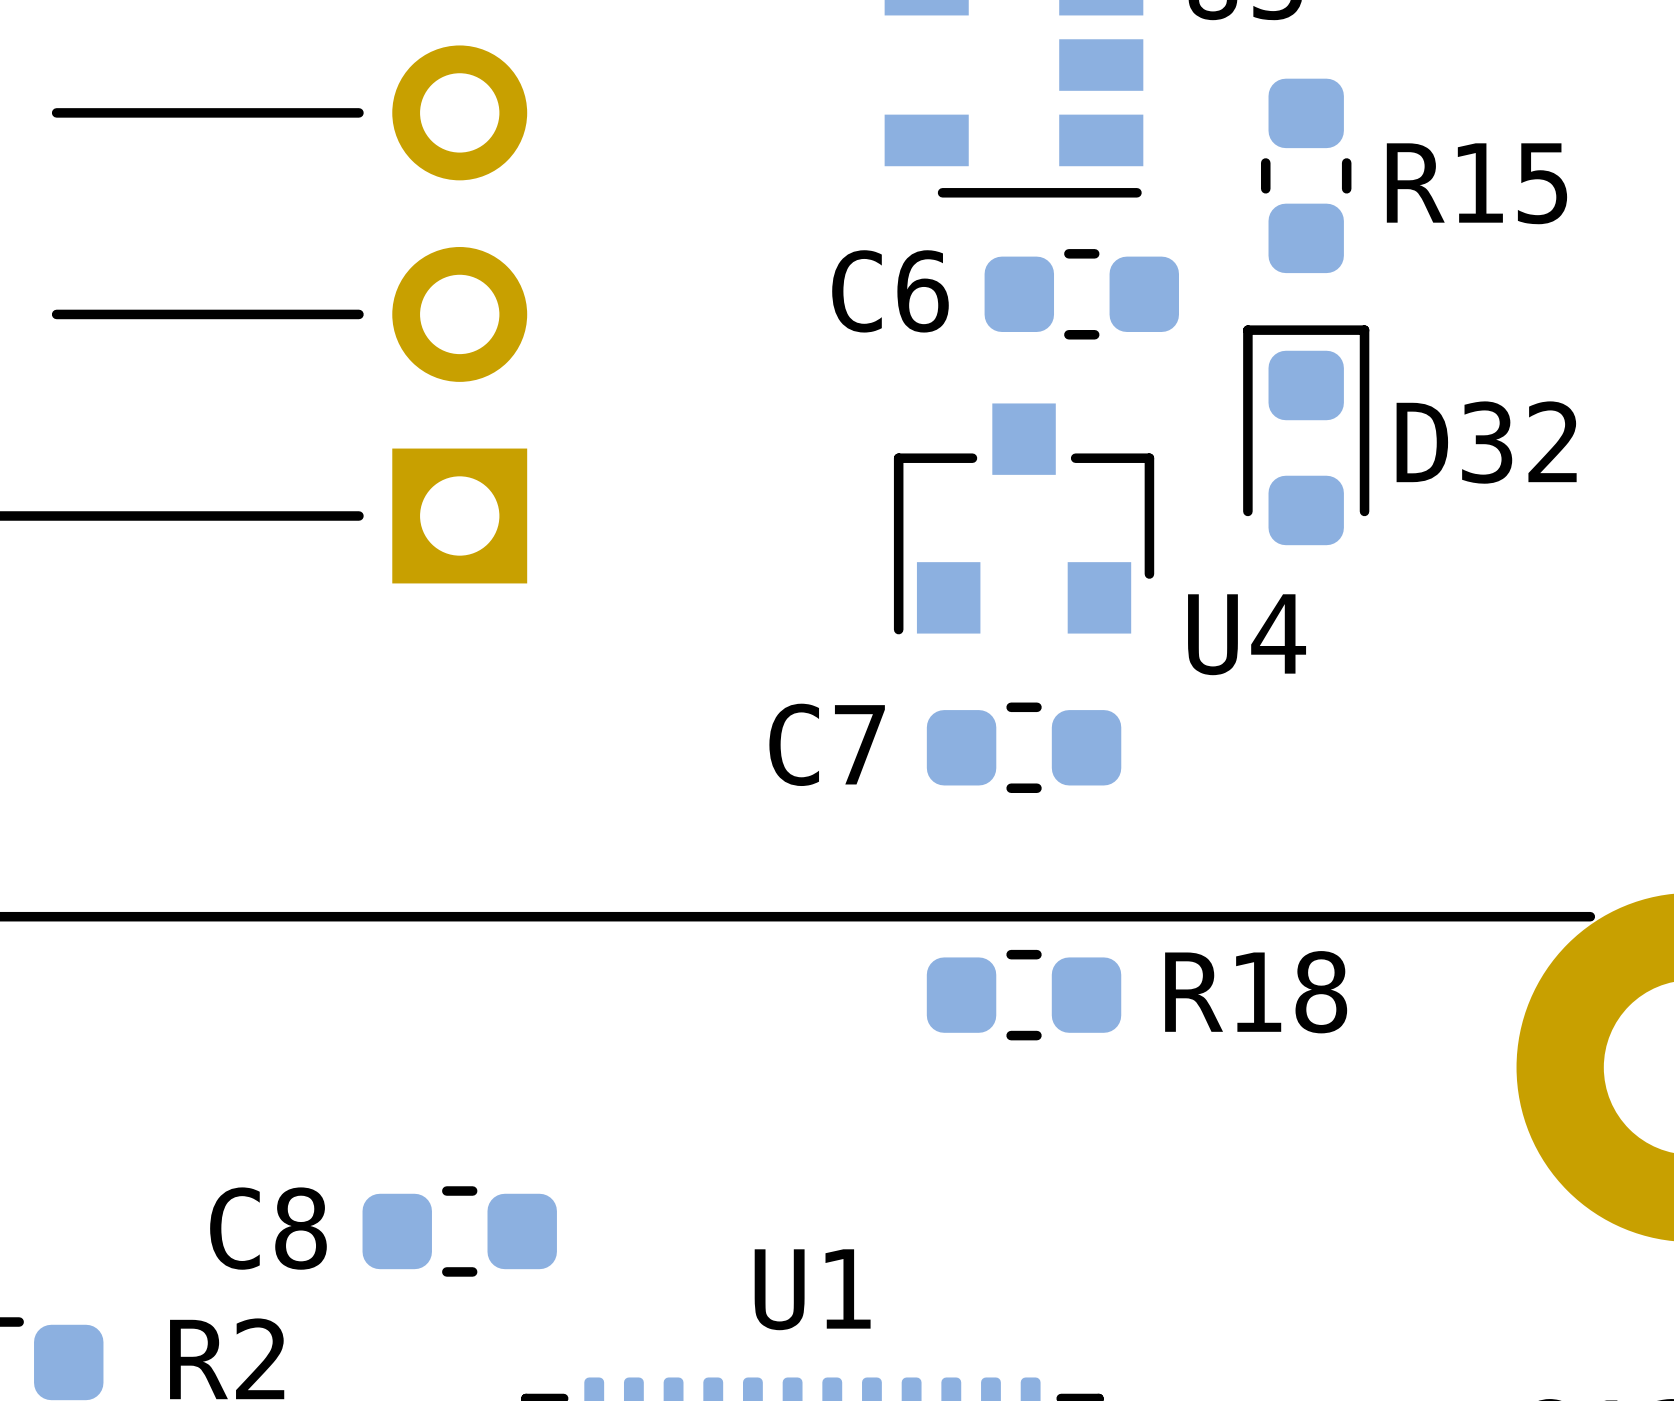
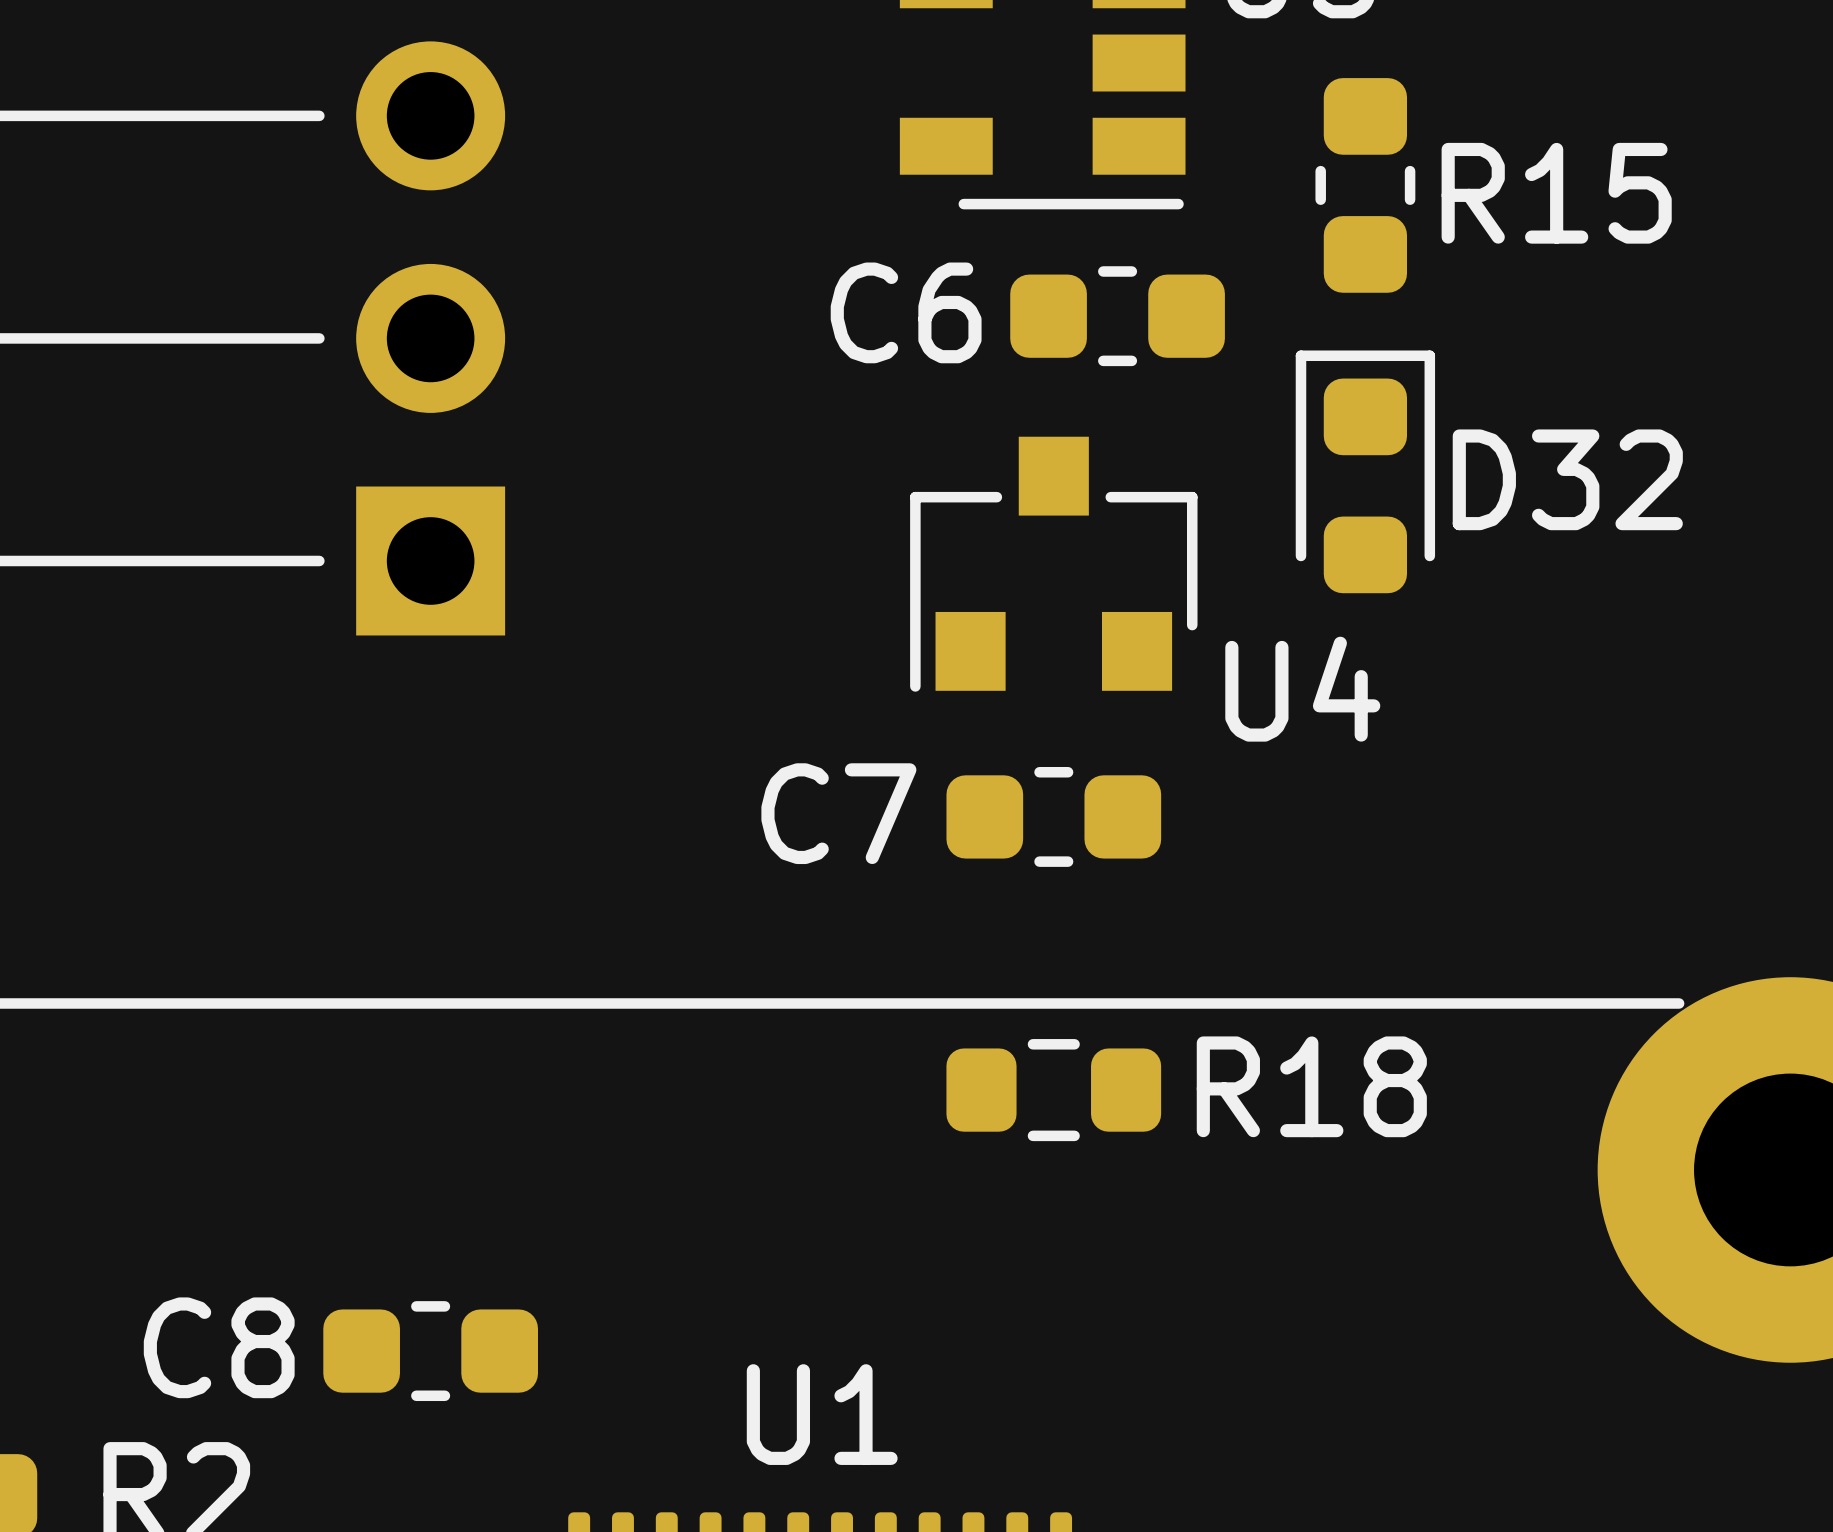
R18 footprint: [926, 949, 1122, 1041] -> [946, 1039, 1162, 1142]

